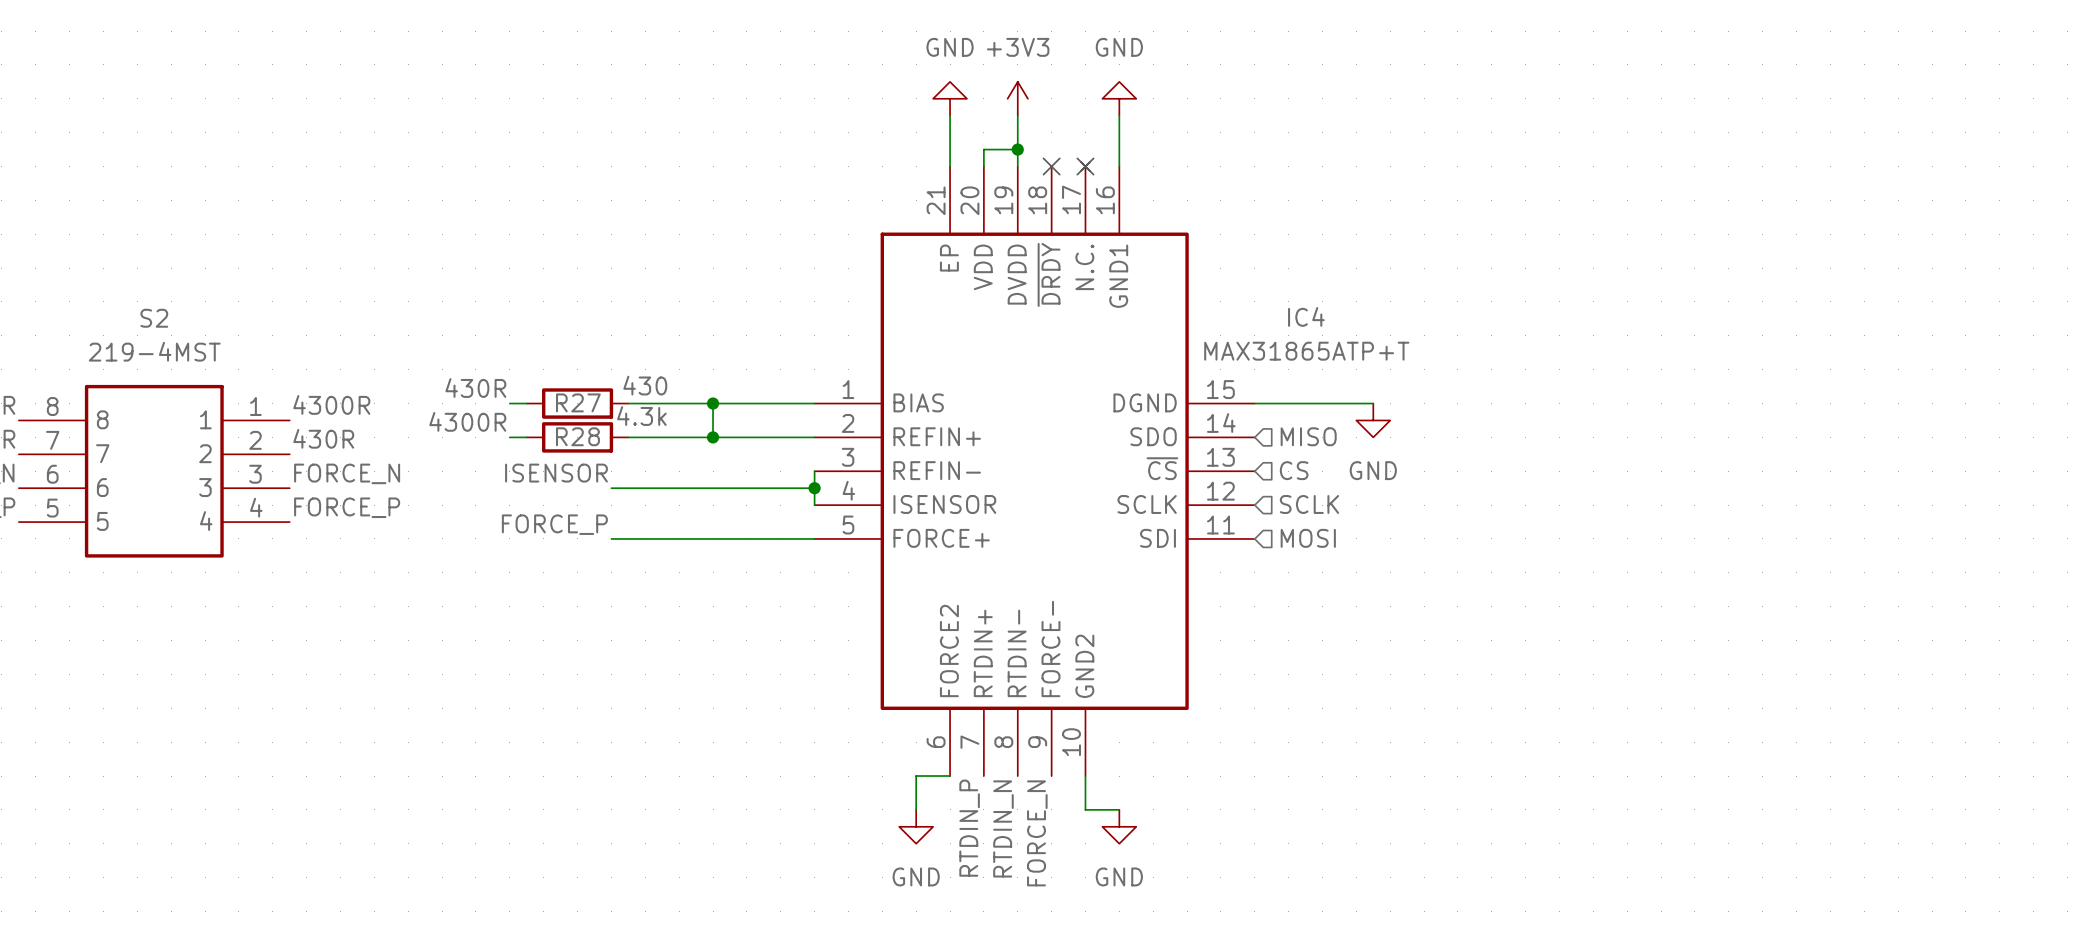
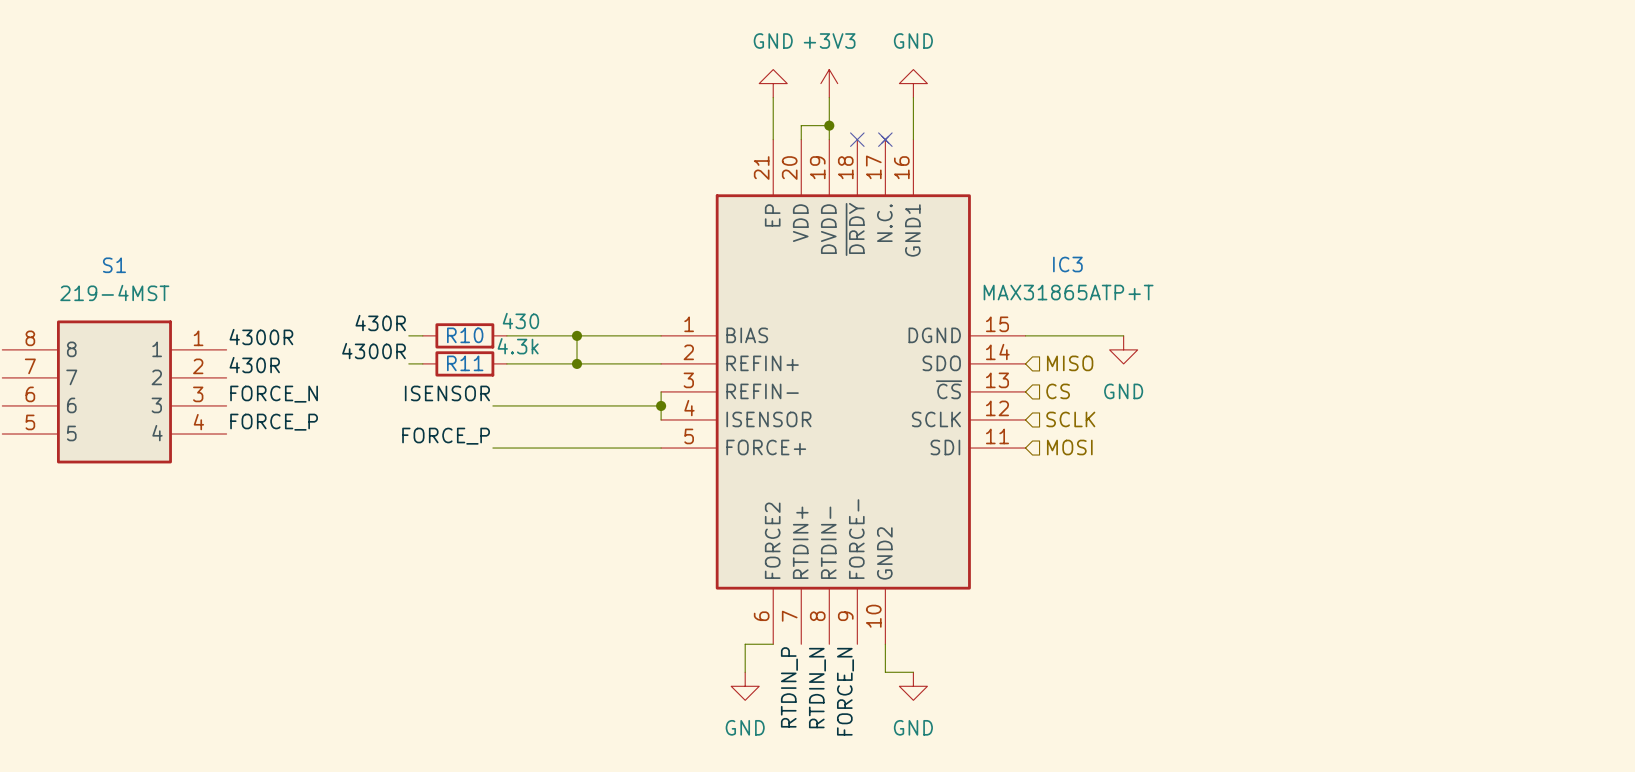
IC4 name: IC4 (1306, 316) -> IC3 (1067, 264)
S2 name: S2 (154, 318) -> S1 (114, 265)
R27 name: R27 (578, 402) -> R10 (465, 335)
R28 name: R28 (577, 436) -> R11 (465, 363)

